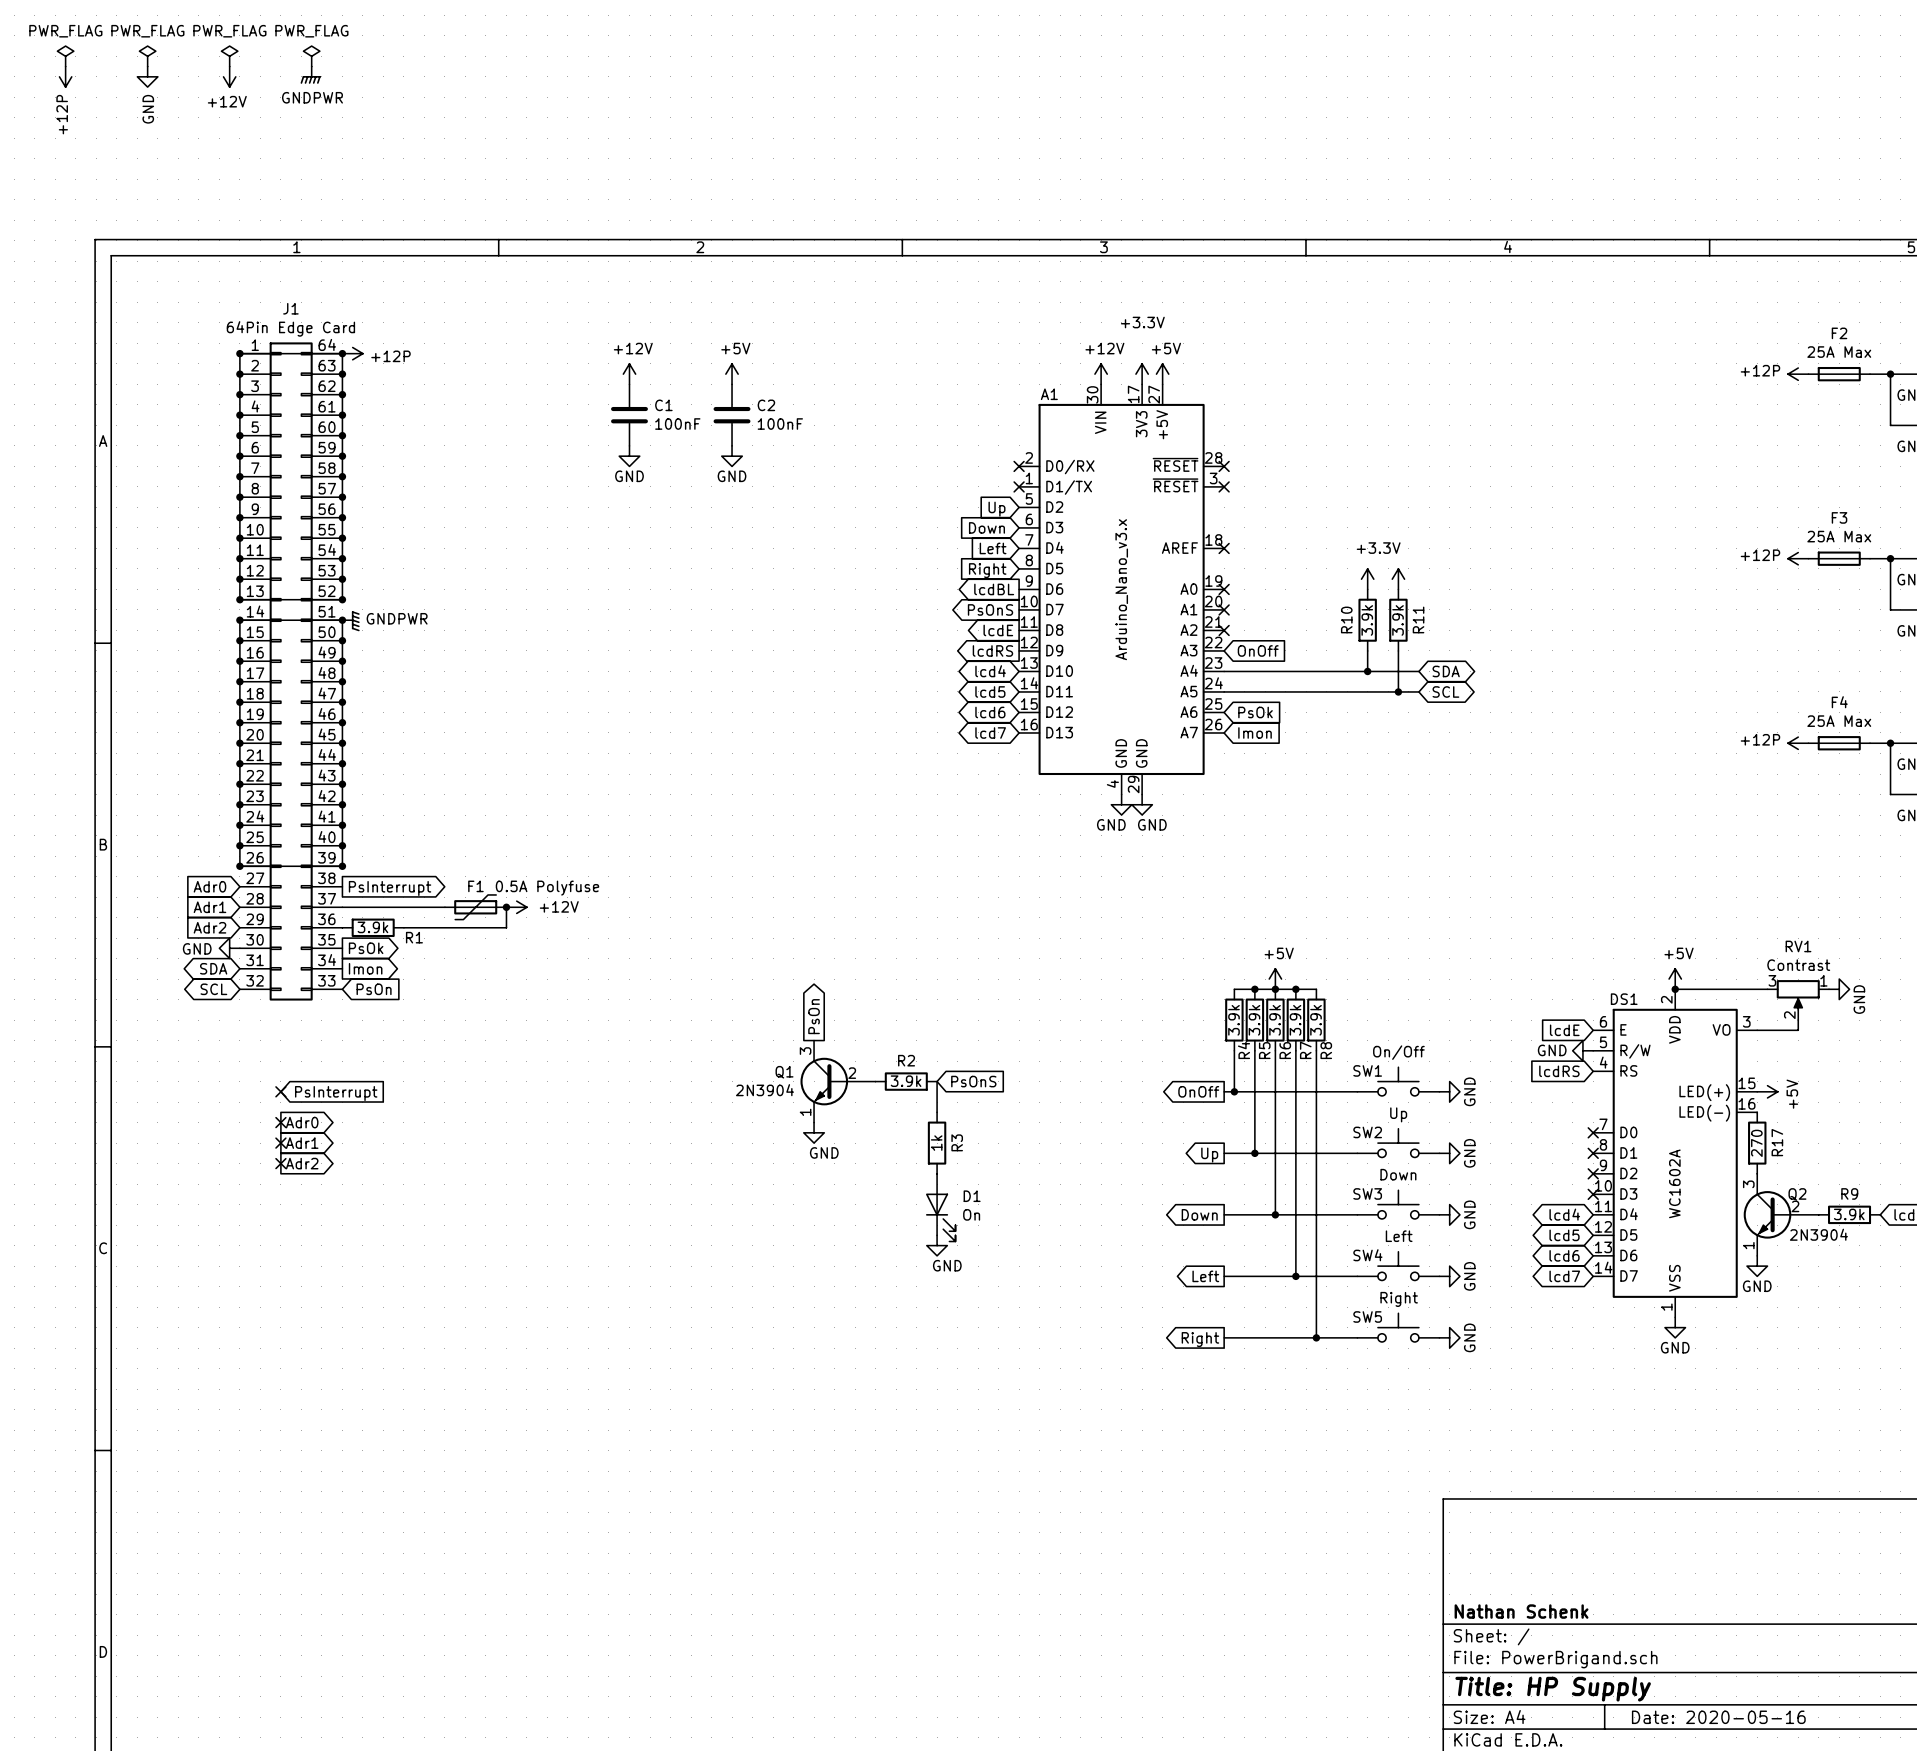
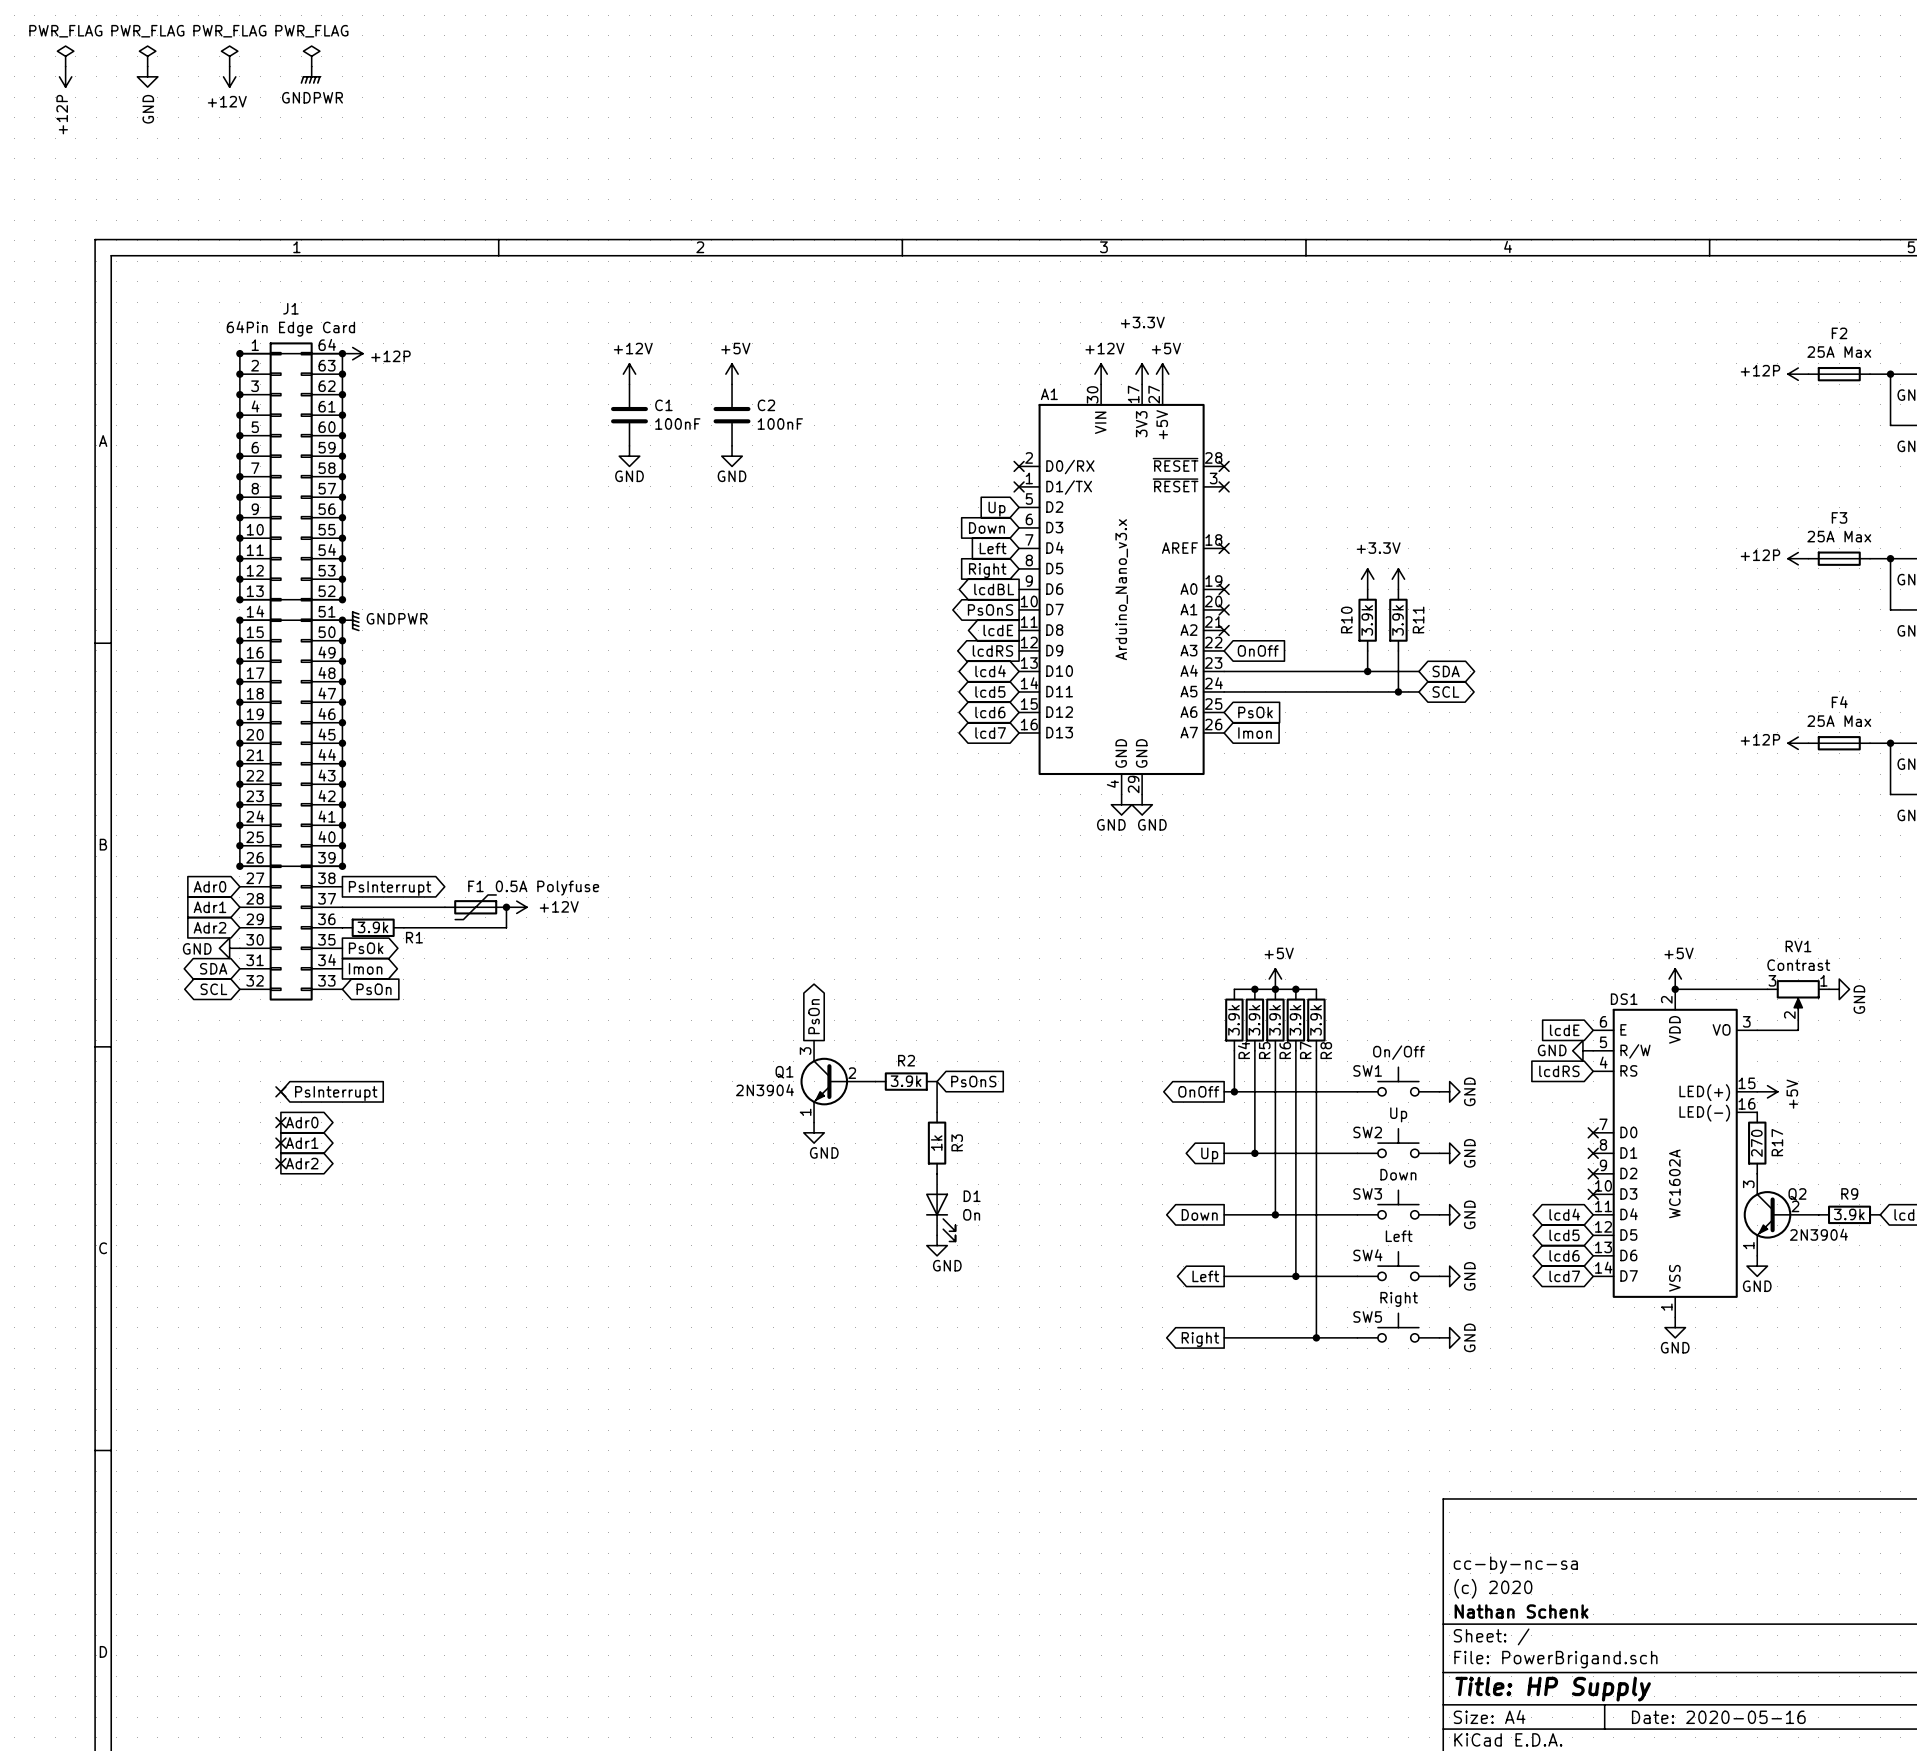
title block: none -> cc-by-nc-sa (1515, 1565)
title block: none -> (c) 2020 (1493, 1588)

